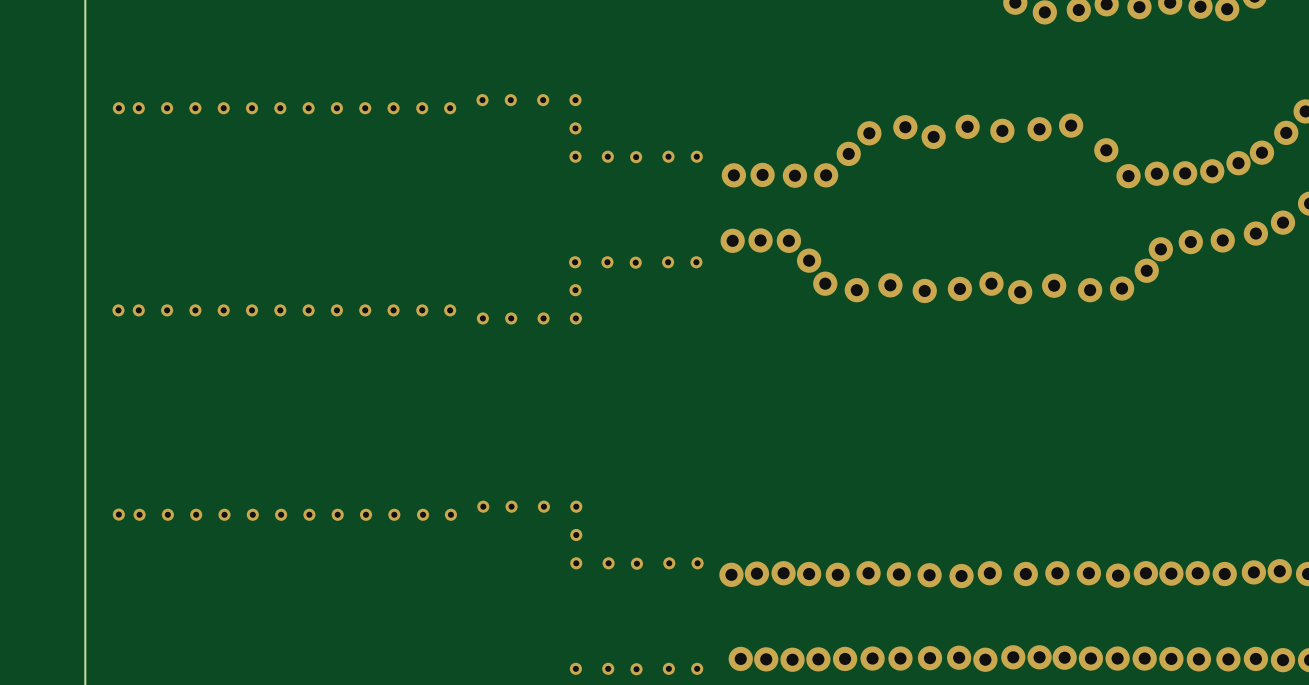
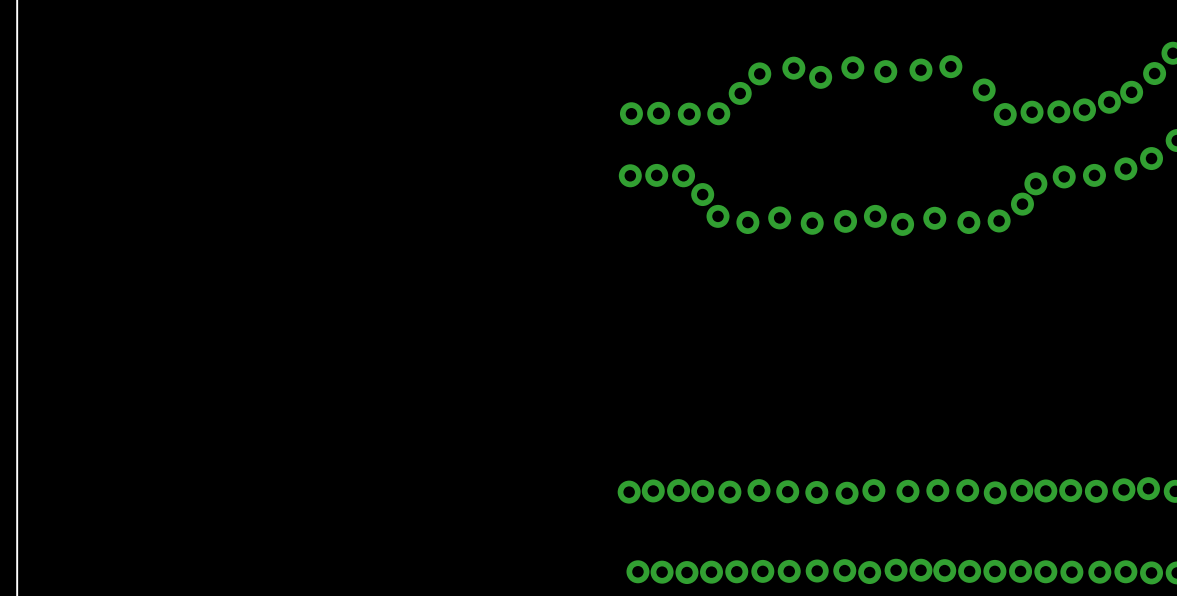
via: (482, 100) -> none
via: (510, 100) -> none
via: (543, 100) -> none
via: (575, 100) -> none
via: (118, 108) -> none
via: (138, 108) -> none
via: (167, 108) -> none
via: (195, 108) -> none
via: (223, 108) -> none
via: (252, 108) -> none
via: (280, 108) -> none
via: (308, 108) -> none
via: (336, 108) -> none
via: (365, 108) -> none
via: (393, 108) -> none
via: (422, 108) -> none
via: (450, 108) -> none
via: (575, 128) -> none
via: (575, 156) -> none
via: (607, 156) -> none
via: (668, 156) -> none
via: (696, 156) -> none
via: (636, 157) -> none
via: (575, 262) -> none
via: (607, 262) -> none
via: (635, 262) -> none
via: (668, 262) -> none
via: (696, 262) -> none
via: (575, 290) -> none
via: (118, 310) -> none
via: (138, 310) -> none
via: (167, 310) -> none
via: (195, 310) -> none
via: (223, 310) -> none
via: (252, 310) -> none
via: (280, 310) -> none
via: (308, 310) -> none
via: (336, 310) -> none
via: (365, 310) -> none
via: (393, 310) -> none
via: (422, 310) -> none
via: (450, 310) -> none
via: (482, 318) -> none
via: (511, 318) -> none
via: (543, 318) -> none
via: (575, 318) -> none
via: (483, 506) -> none
via: (511, 506) -> none
via: (543, 506) -> none
via: (576, 506) -> none
via: (118, 514) -> none
via: (139, 514) -> none
via: (167, 514) -> none
via: (196, 514) -> none
via: (224, 514) -> none
via: (252, 514) -> none
via: (281, 514) -> none
via: (309, 514) -> none
via: (337, 514) -> none
via: (366, 514) -> none
via: (394, 514) -> none
via: (423, 514) -> none
via: (450, 514) -> none
via: (576, 534) -> none
via: (576, 563) -> none
via: (608, 563) -> none
via: (636, 563) -> none
via: (669, 563) -> none
via: (697, 563) -> none
via: (575, 668) -> none
via: (608, 668) -> none
via: (668, 668) -> none
via: (697, 668) -> none
via: (636, 669) -> none

